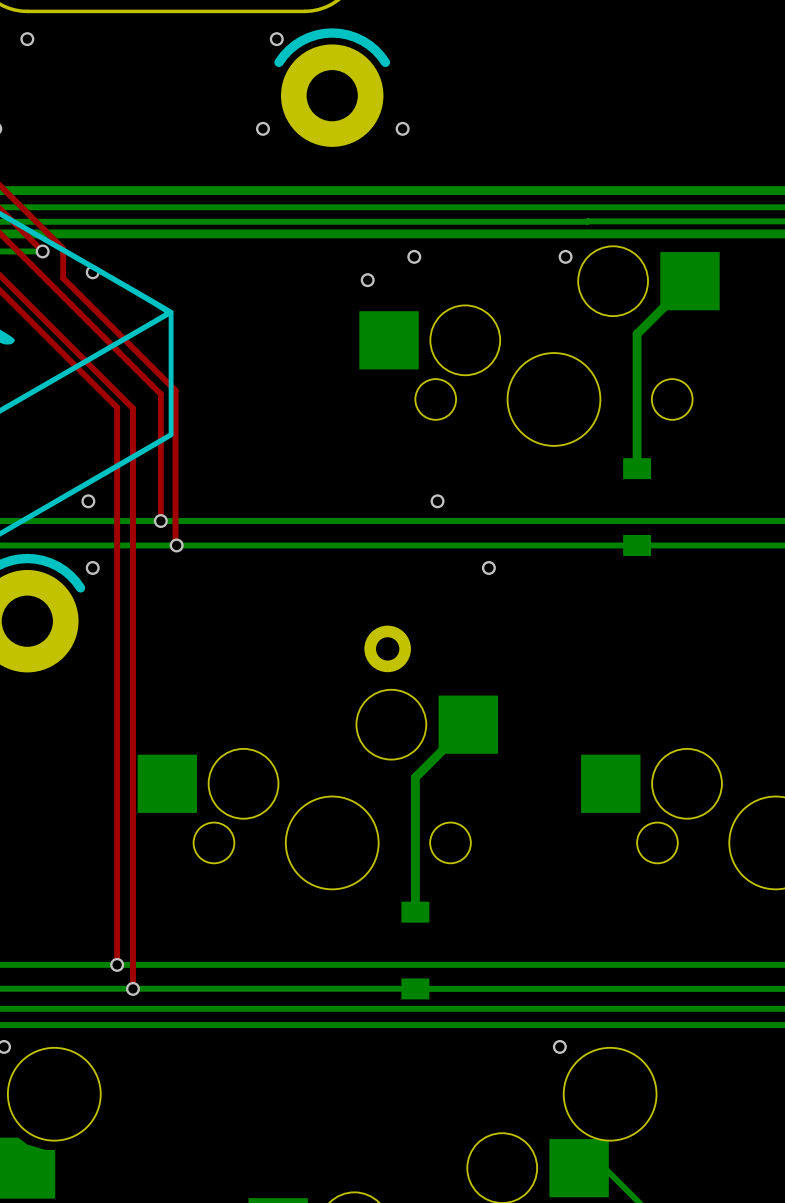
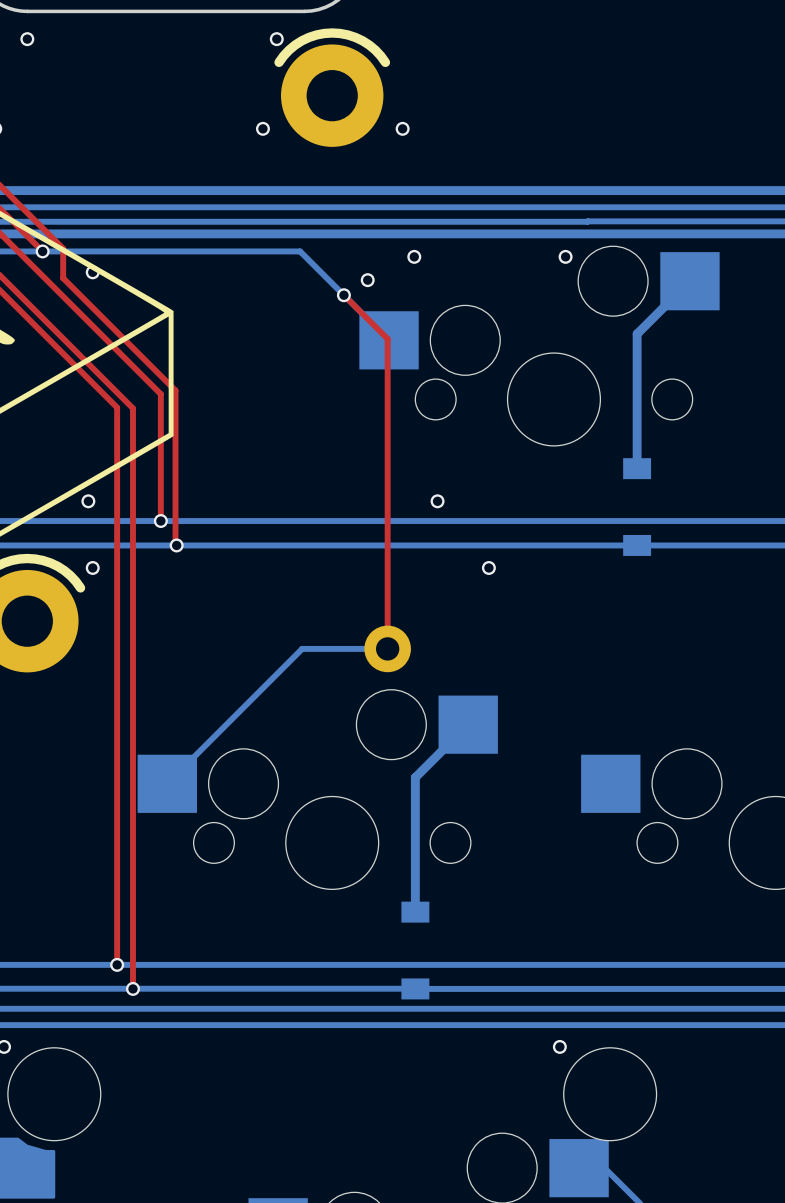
bottom track: none -> (42, 251) (300, 251) (389, 340)
top track: none -> (343, 295) (387, 338) (387, 648)
via: none -> (343, 295)
bottom track: none -> (387, 648) (302, 648) (167, 783)

